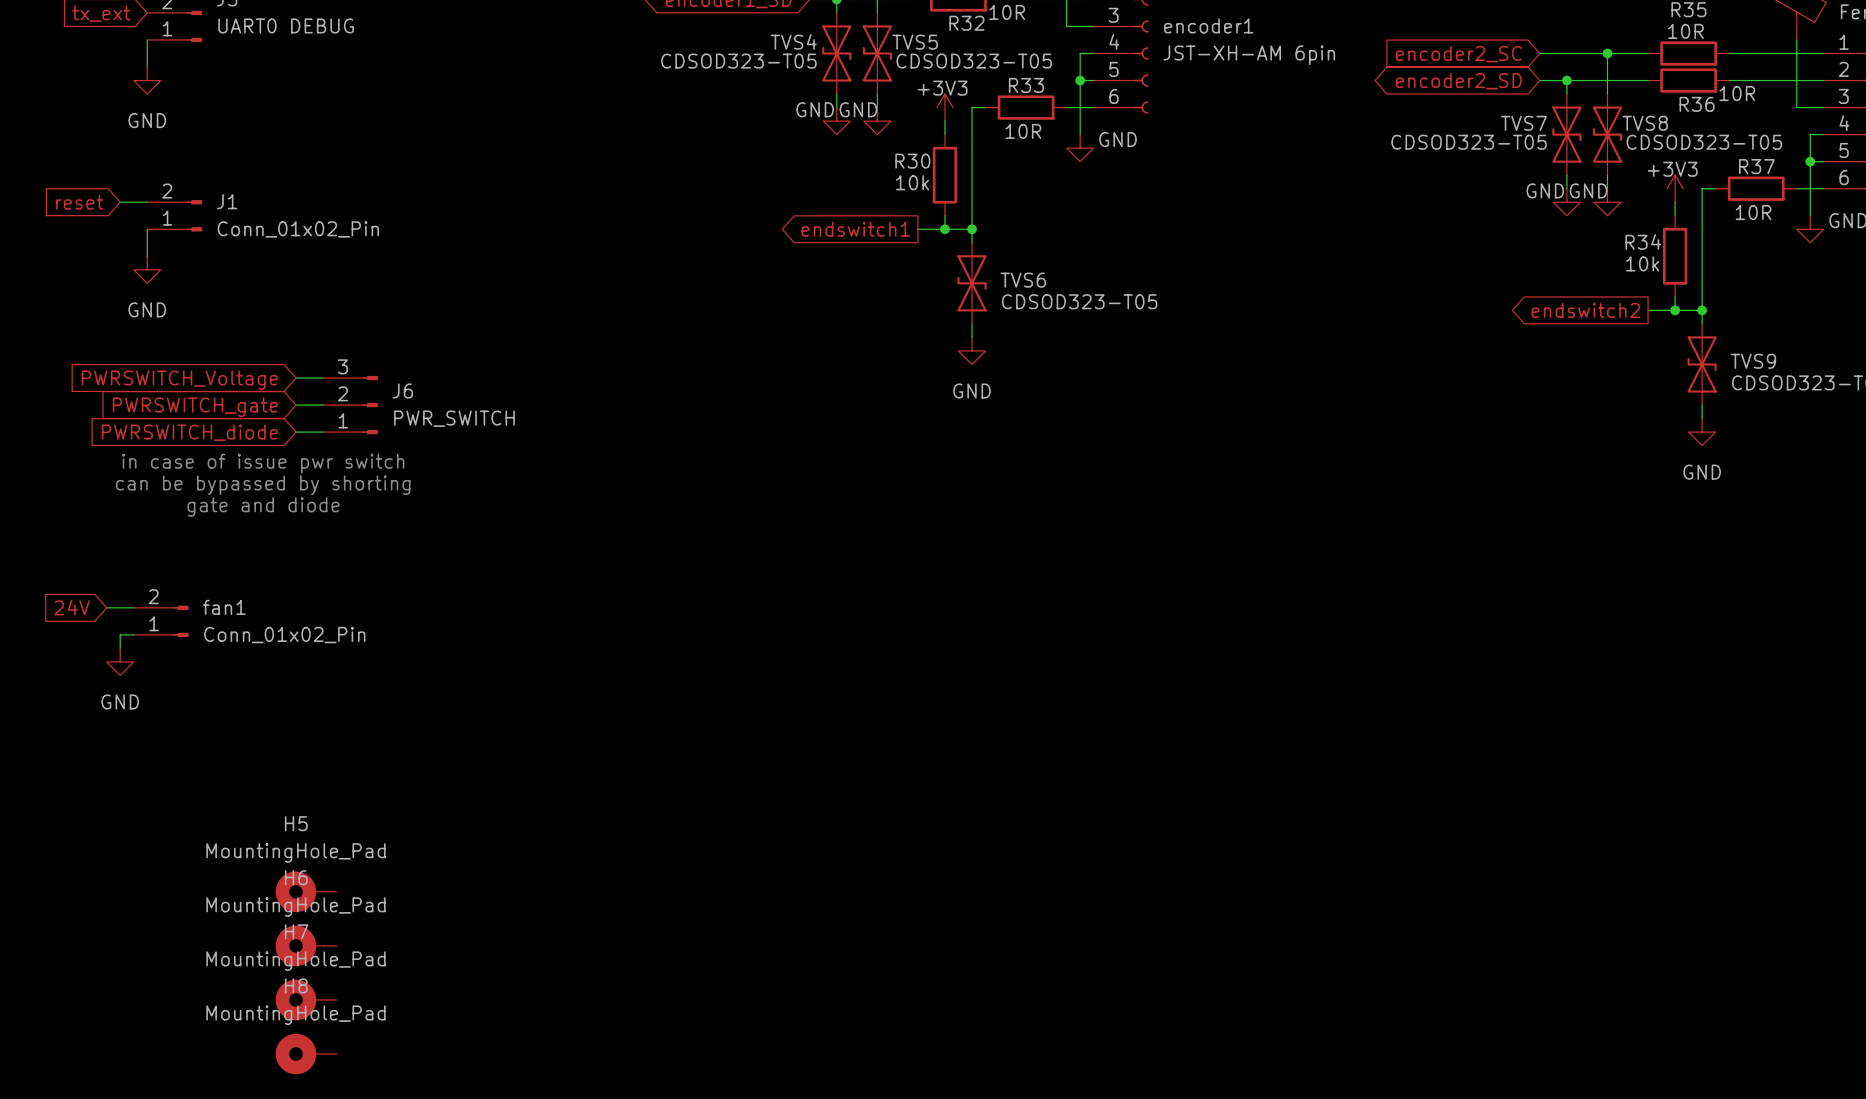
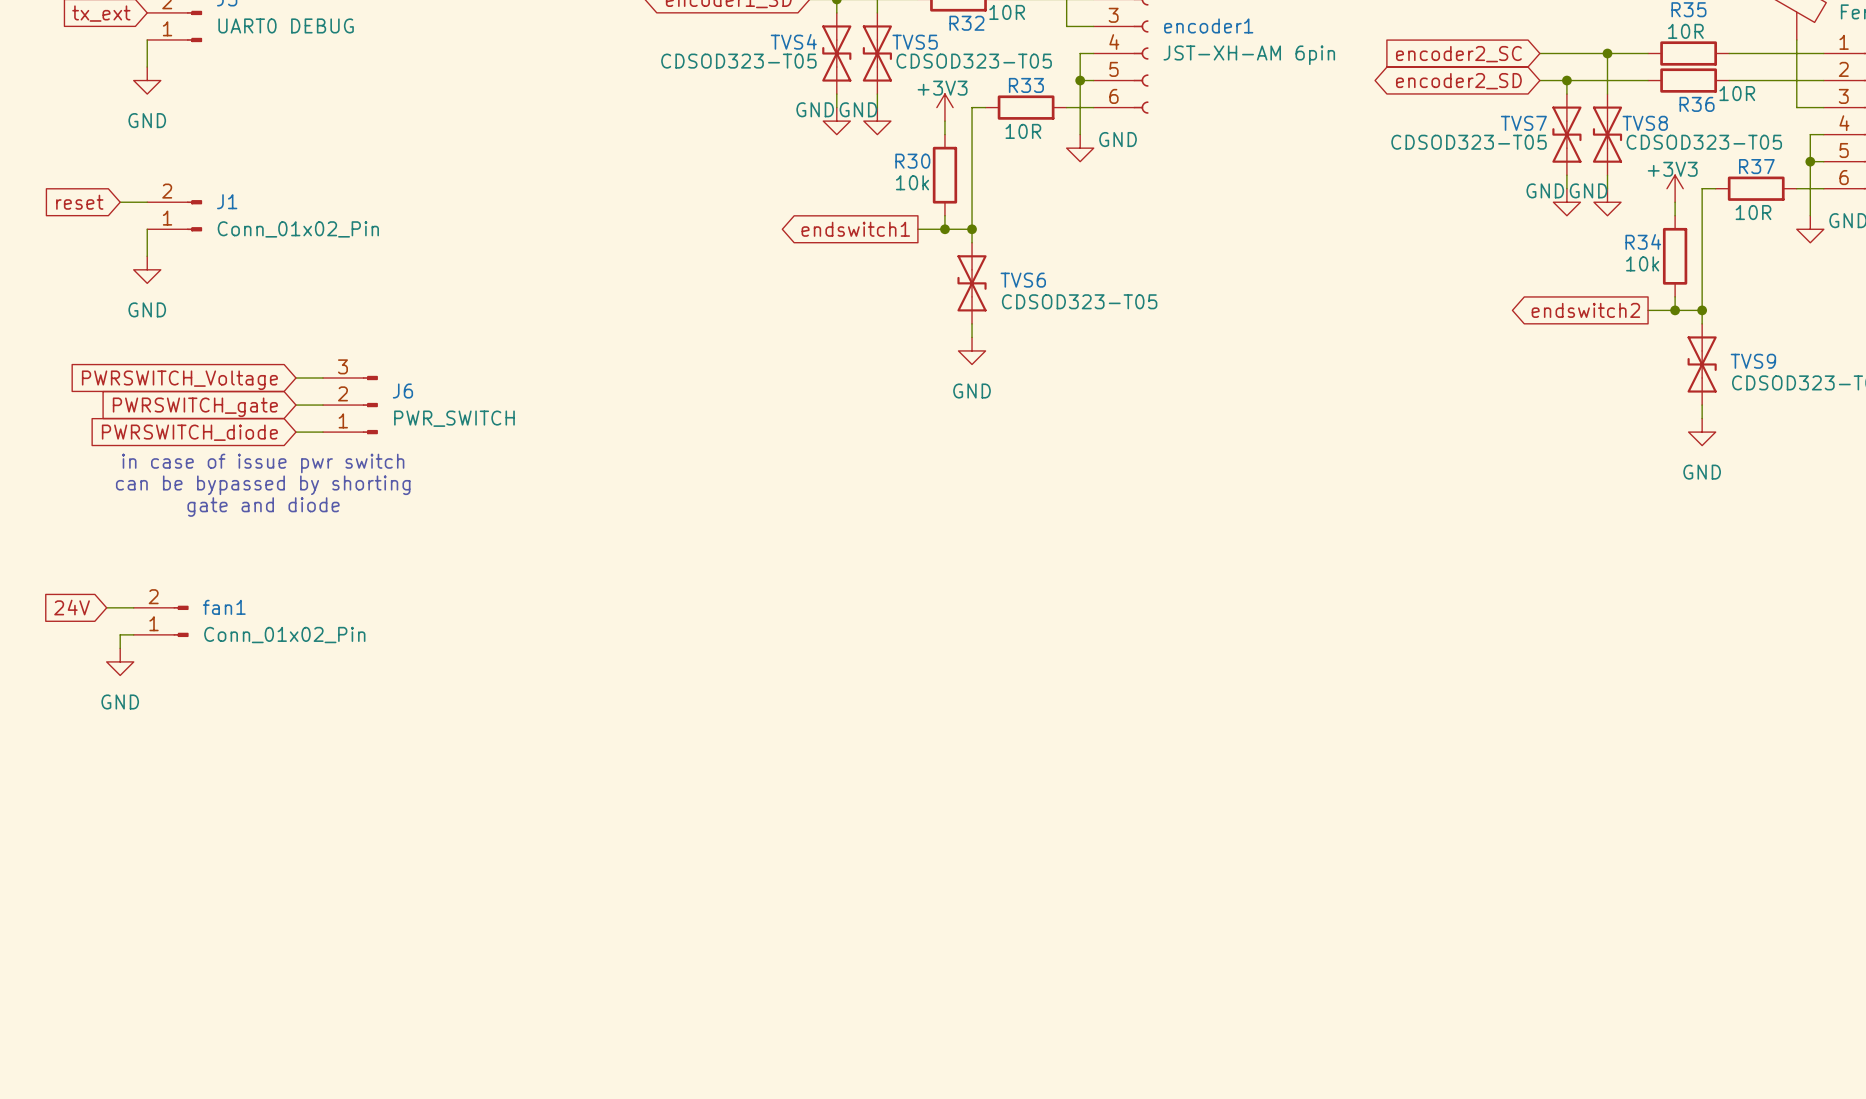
H5: MountingHole_Pad (306, 891) -> none
H6: MountingHole_Pad (306, 945) -> none
H7: MountingHole_Pad (306, 999) -> none
H8: MountingHole_Pad (306, 1054) -> none

